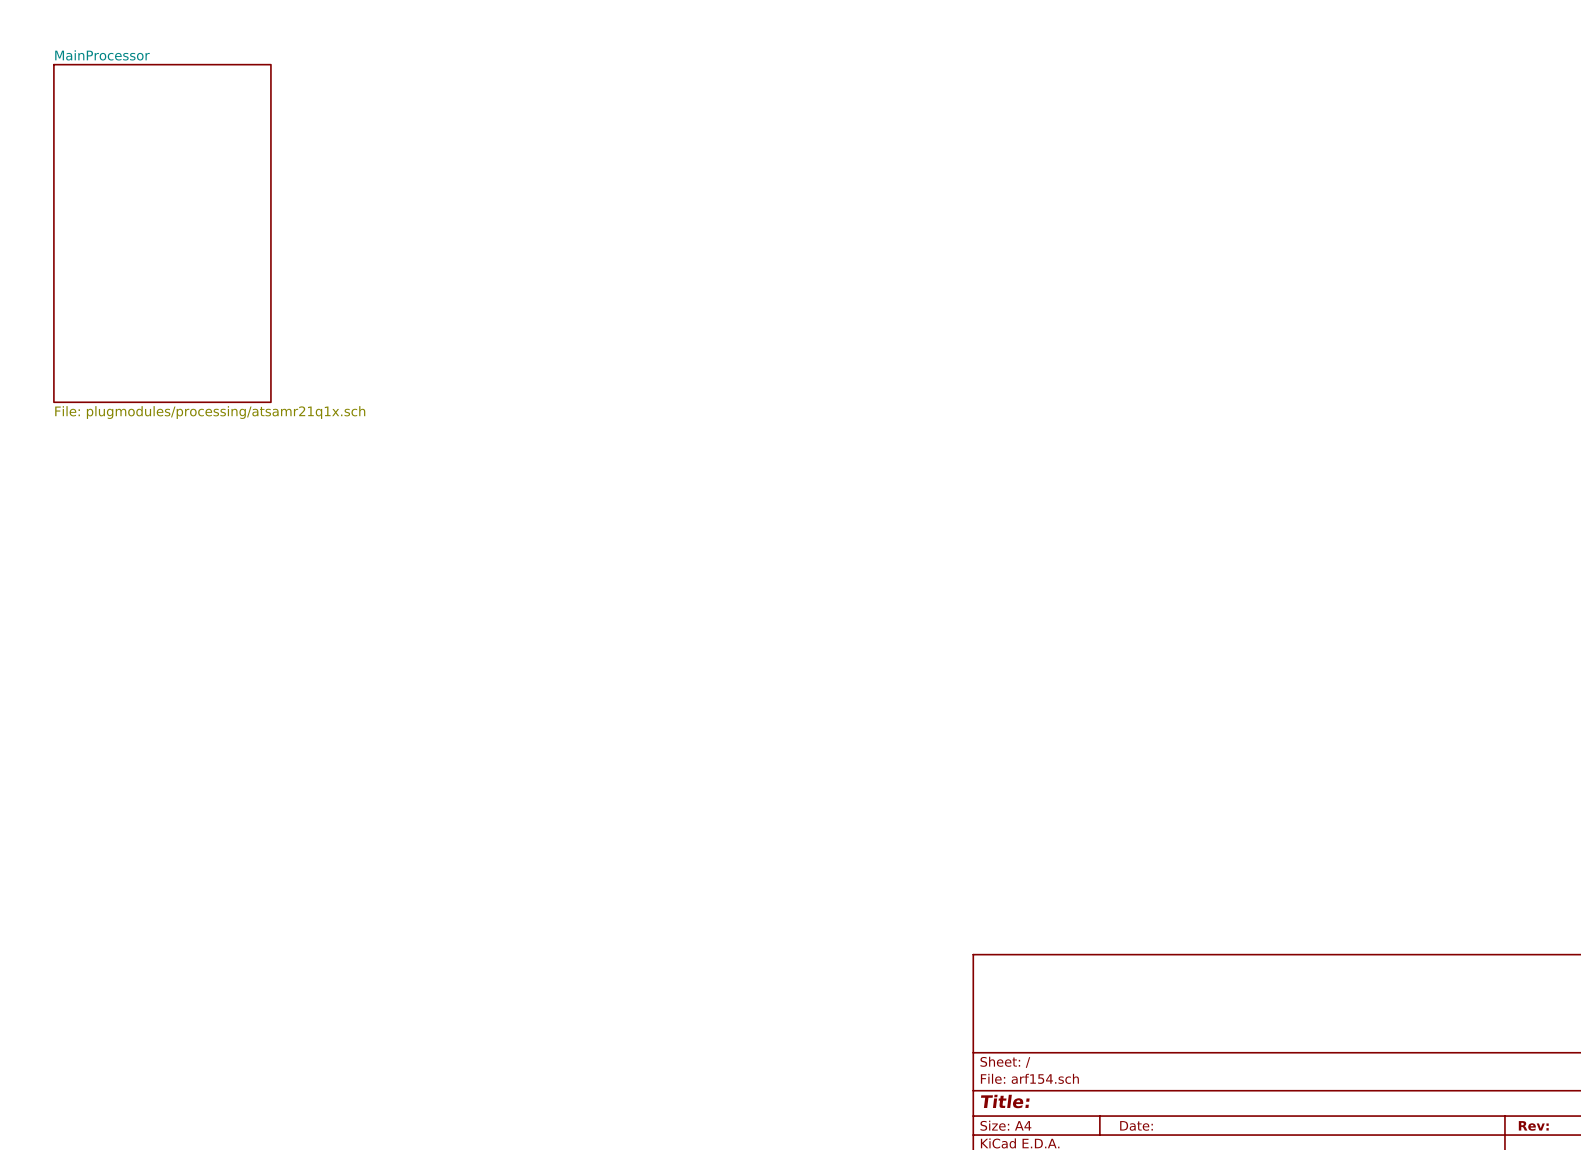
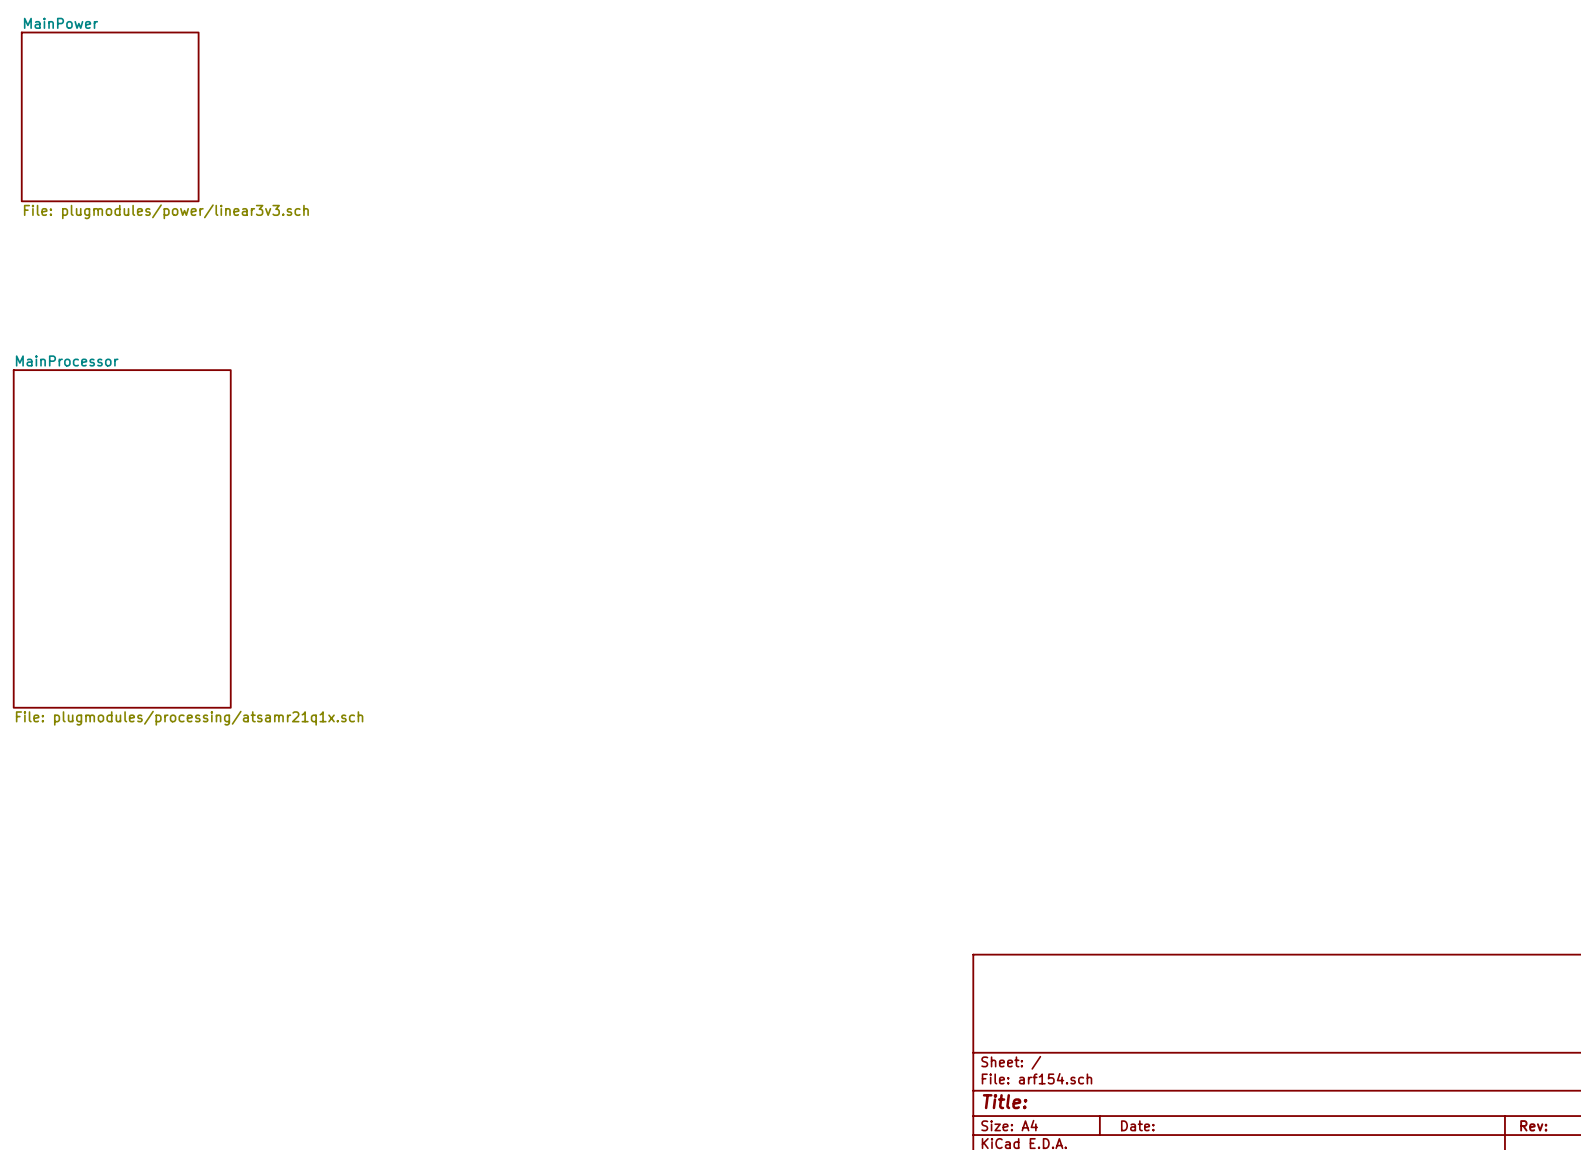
sheet MainPower: none -> File: plugmodules/power/linear3v3.sch (110, 116)
sheet MainProcessor: File: plugmodules/processing/atsamr21q1x.sch (162, 233) -> none
sheet MainProcessor: none -> File: plugmodules/processing/atsamr21q1x.sch (122, 538)

